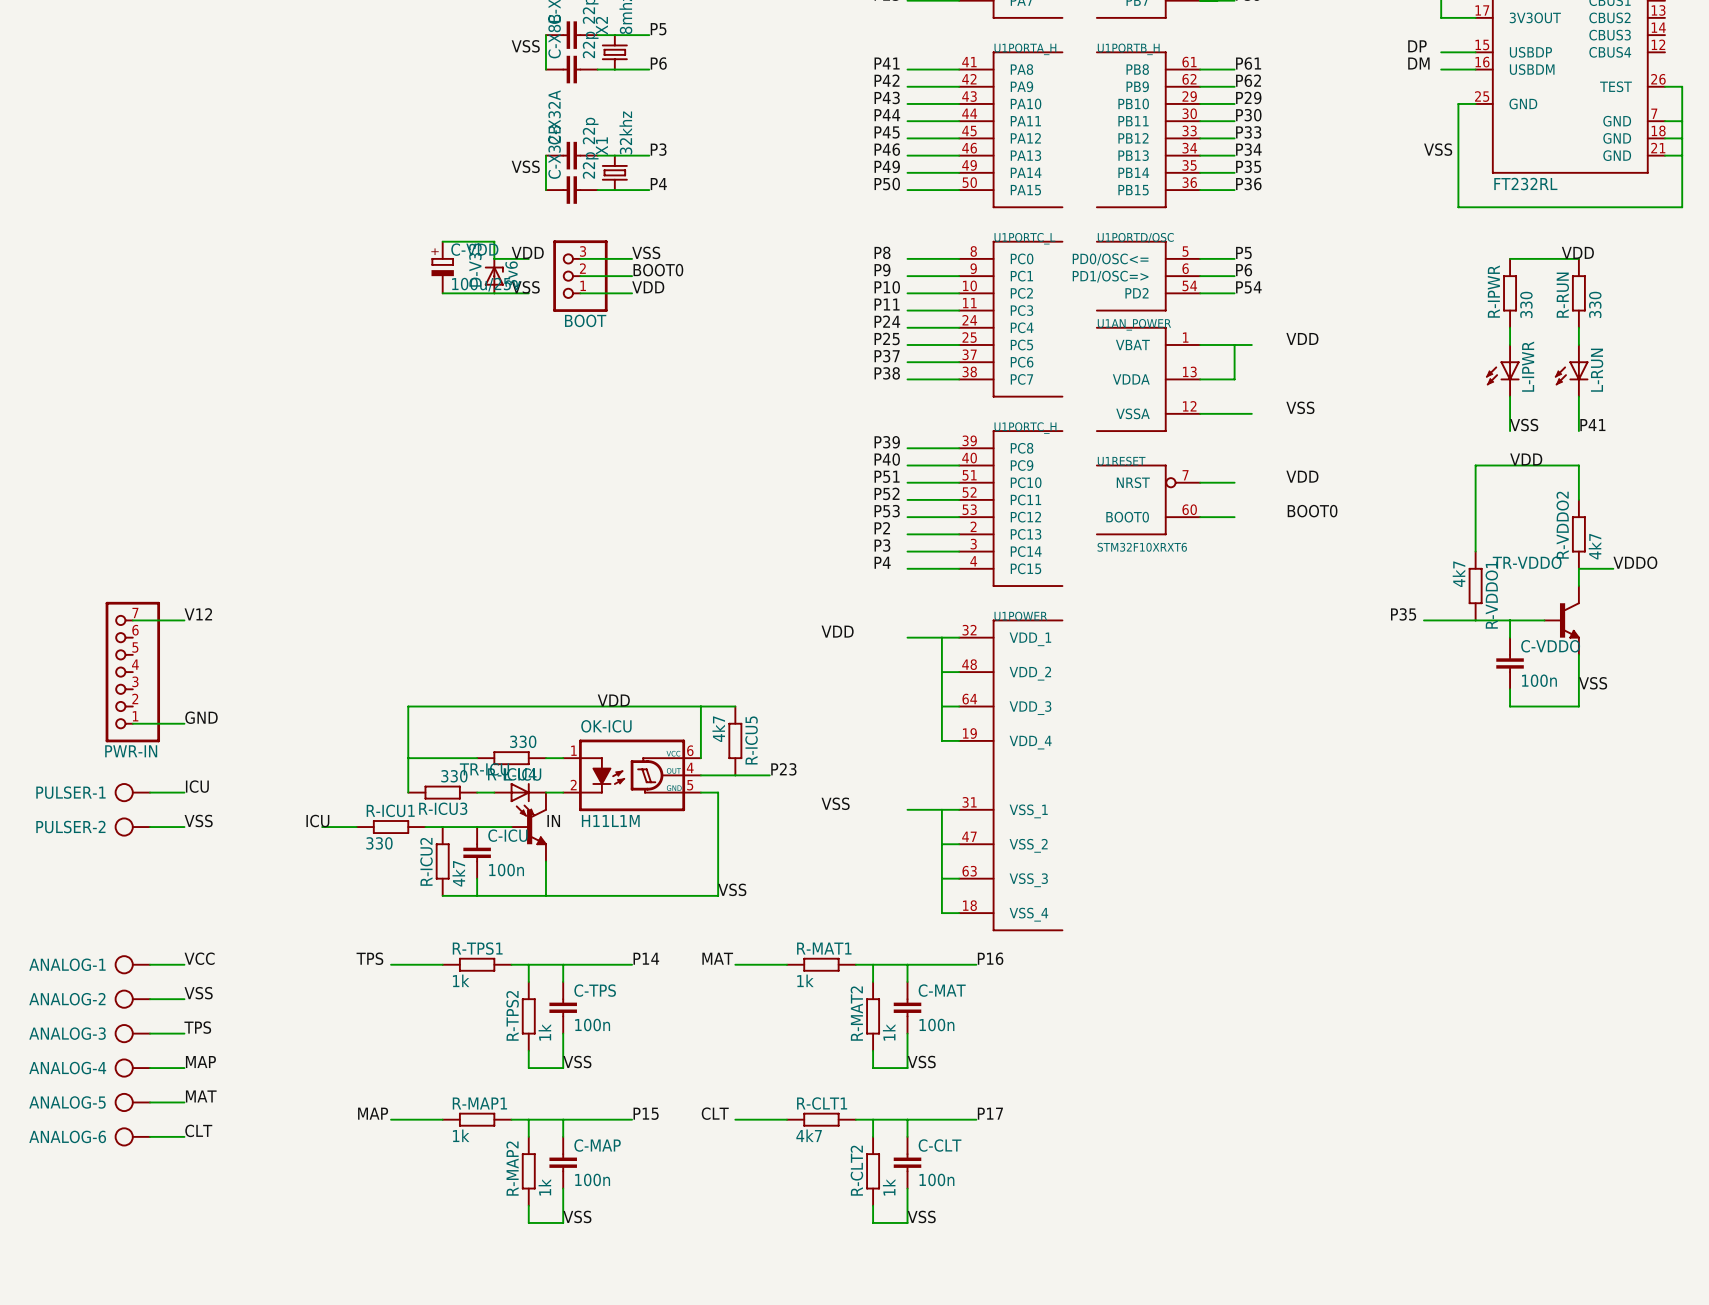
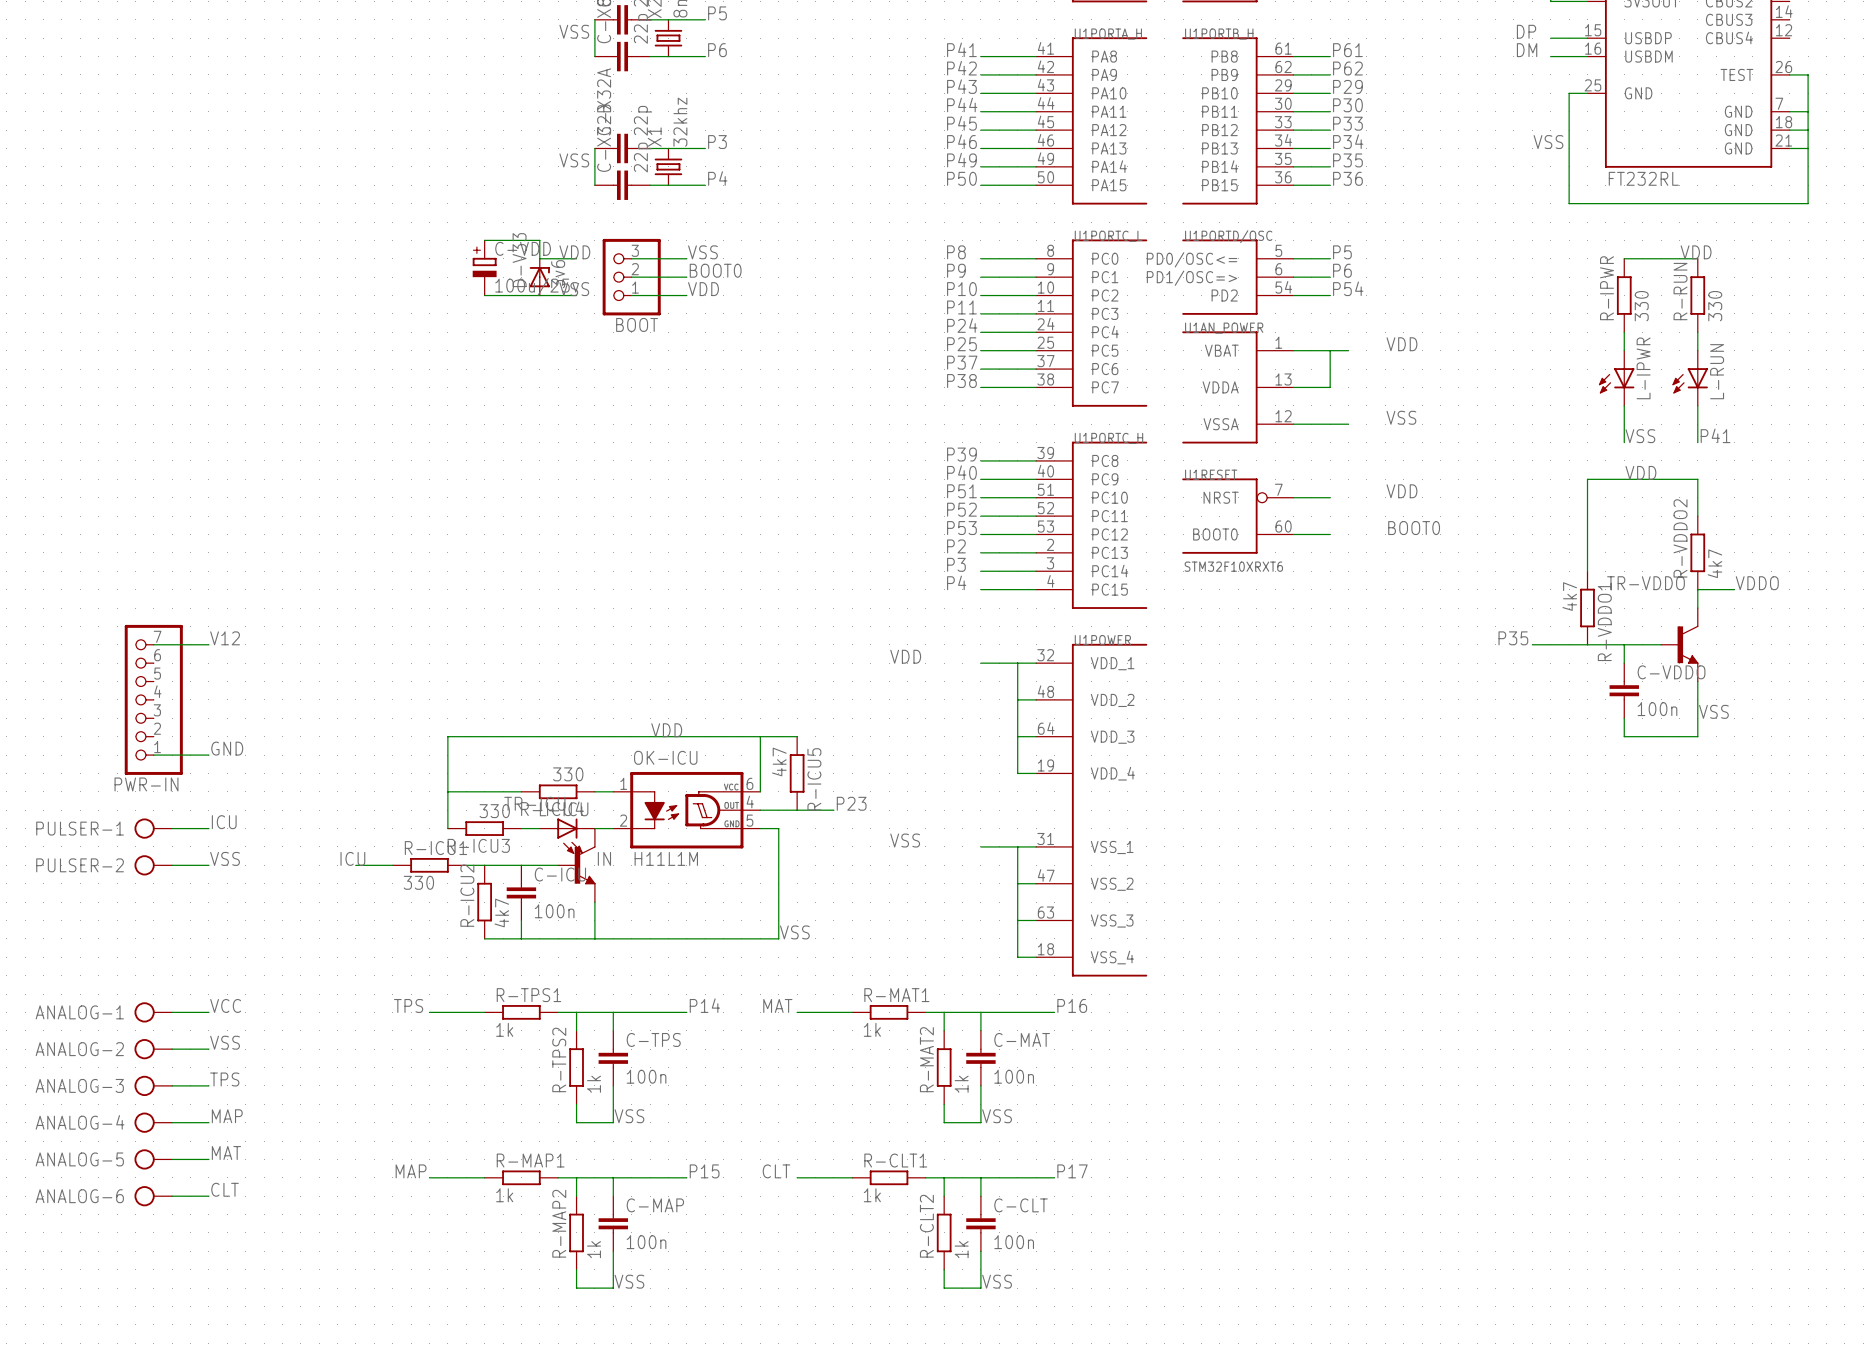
R-CLT1 value: 4k7 (809, 1135) -> 1k (872, 1195)

